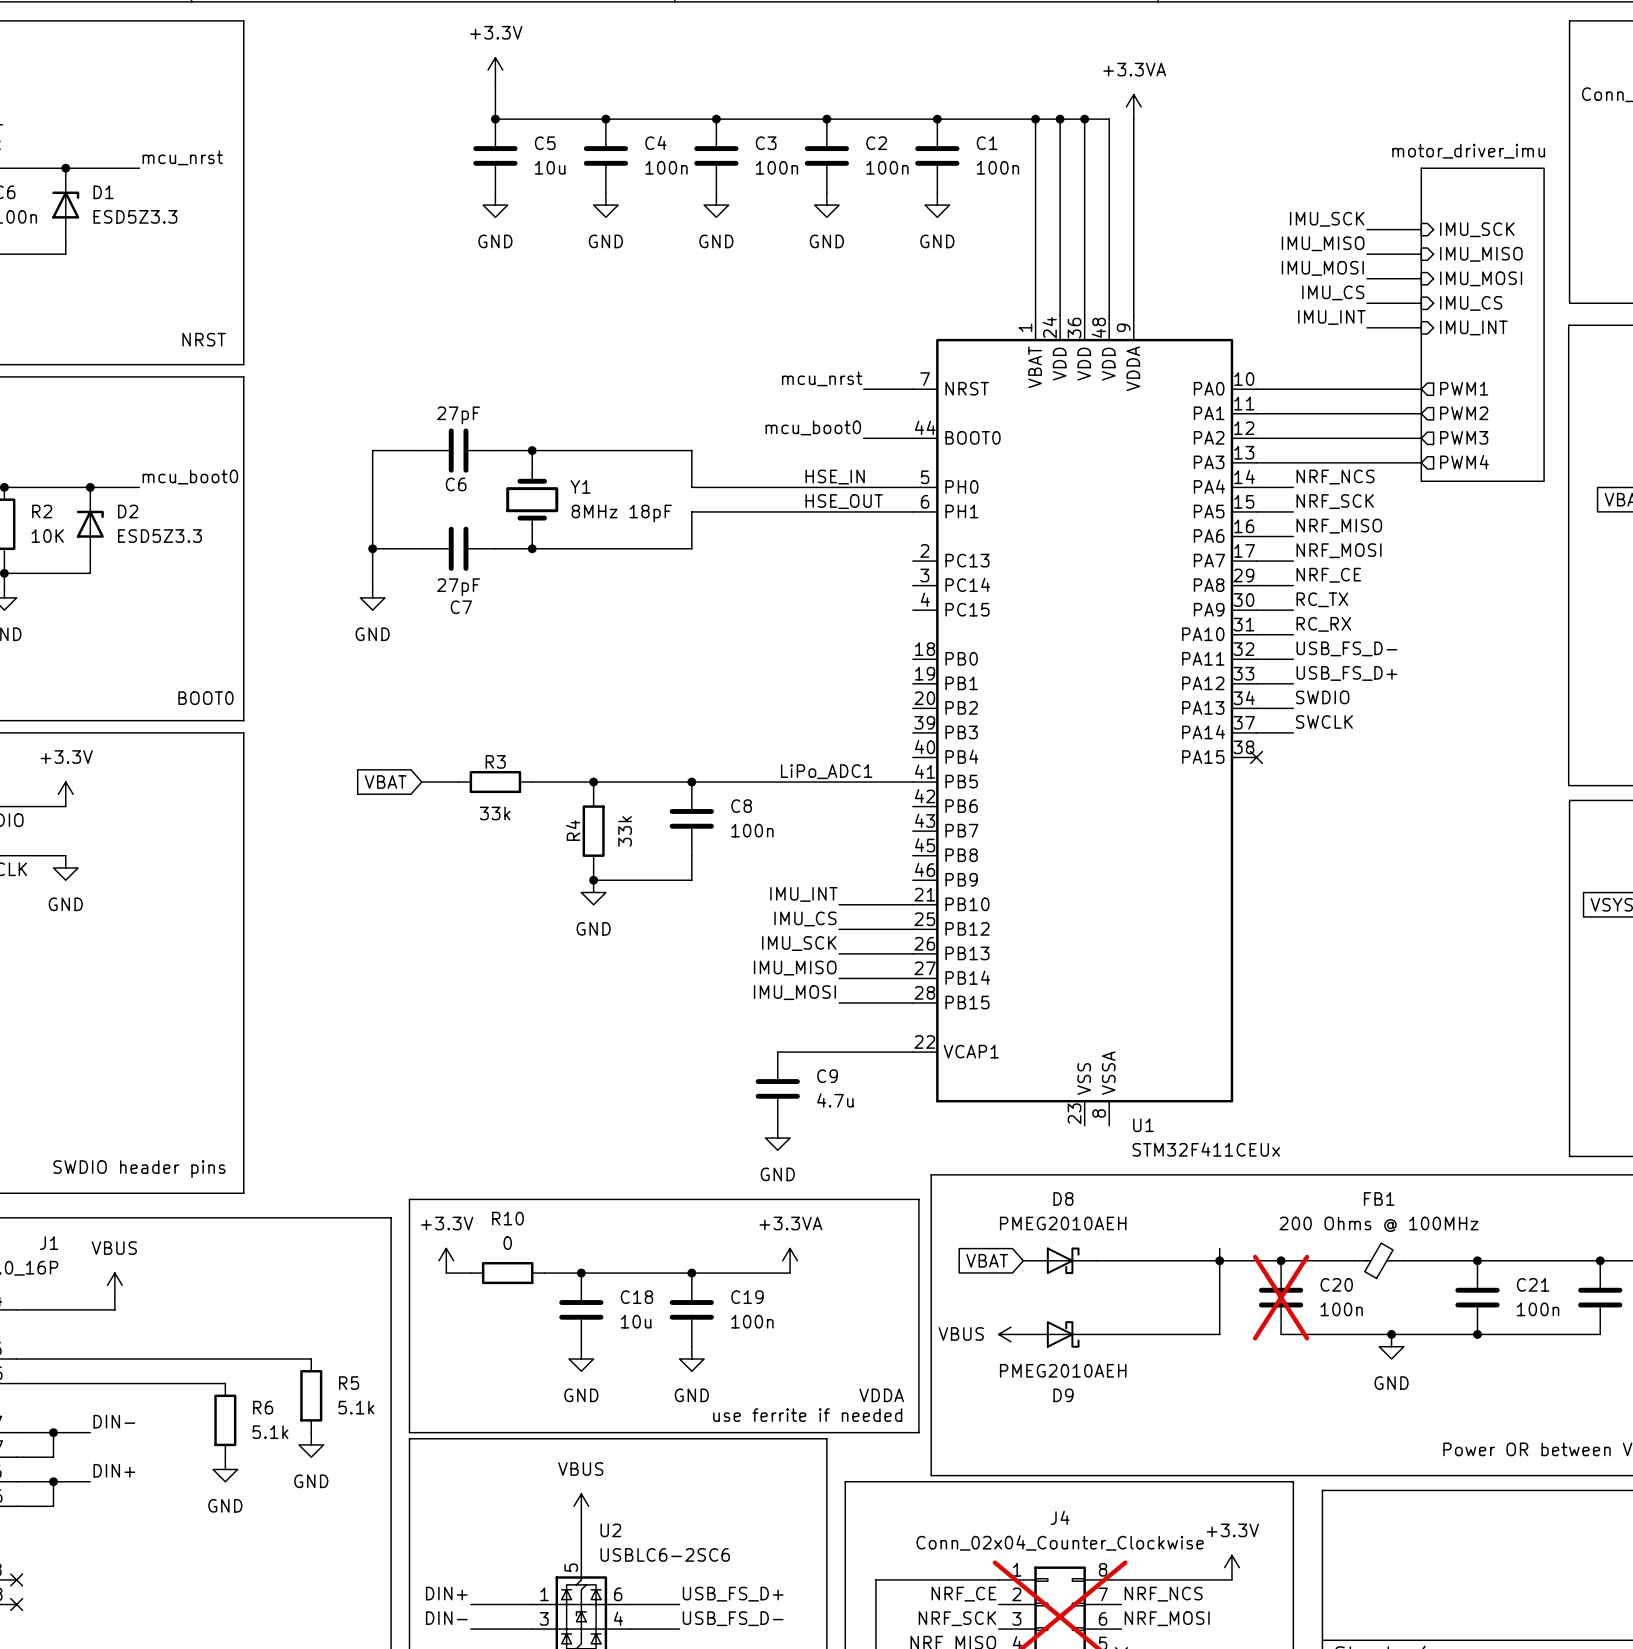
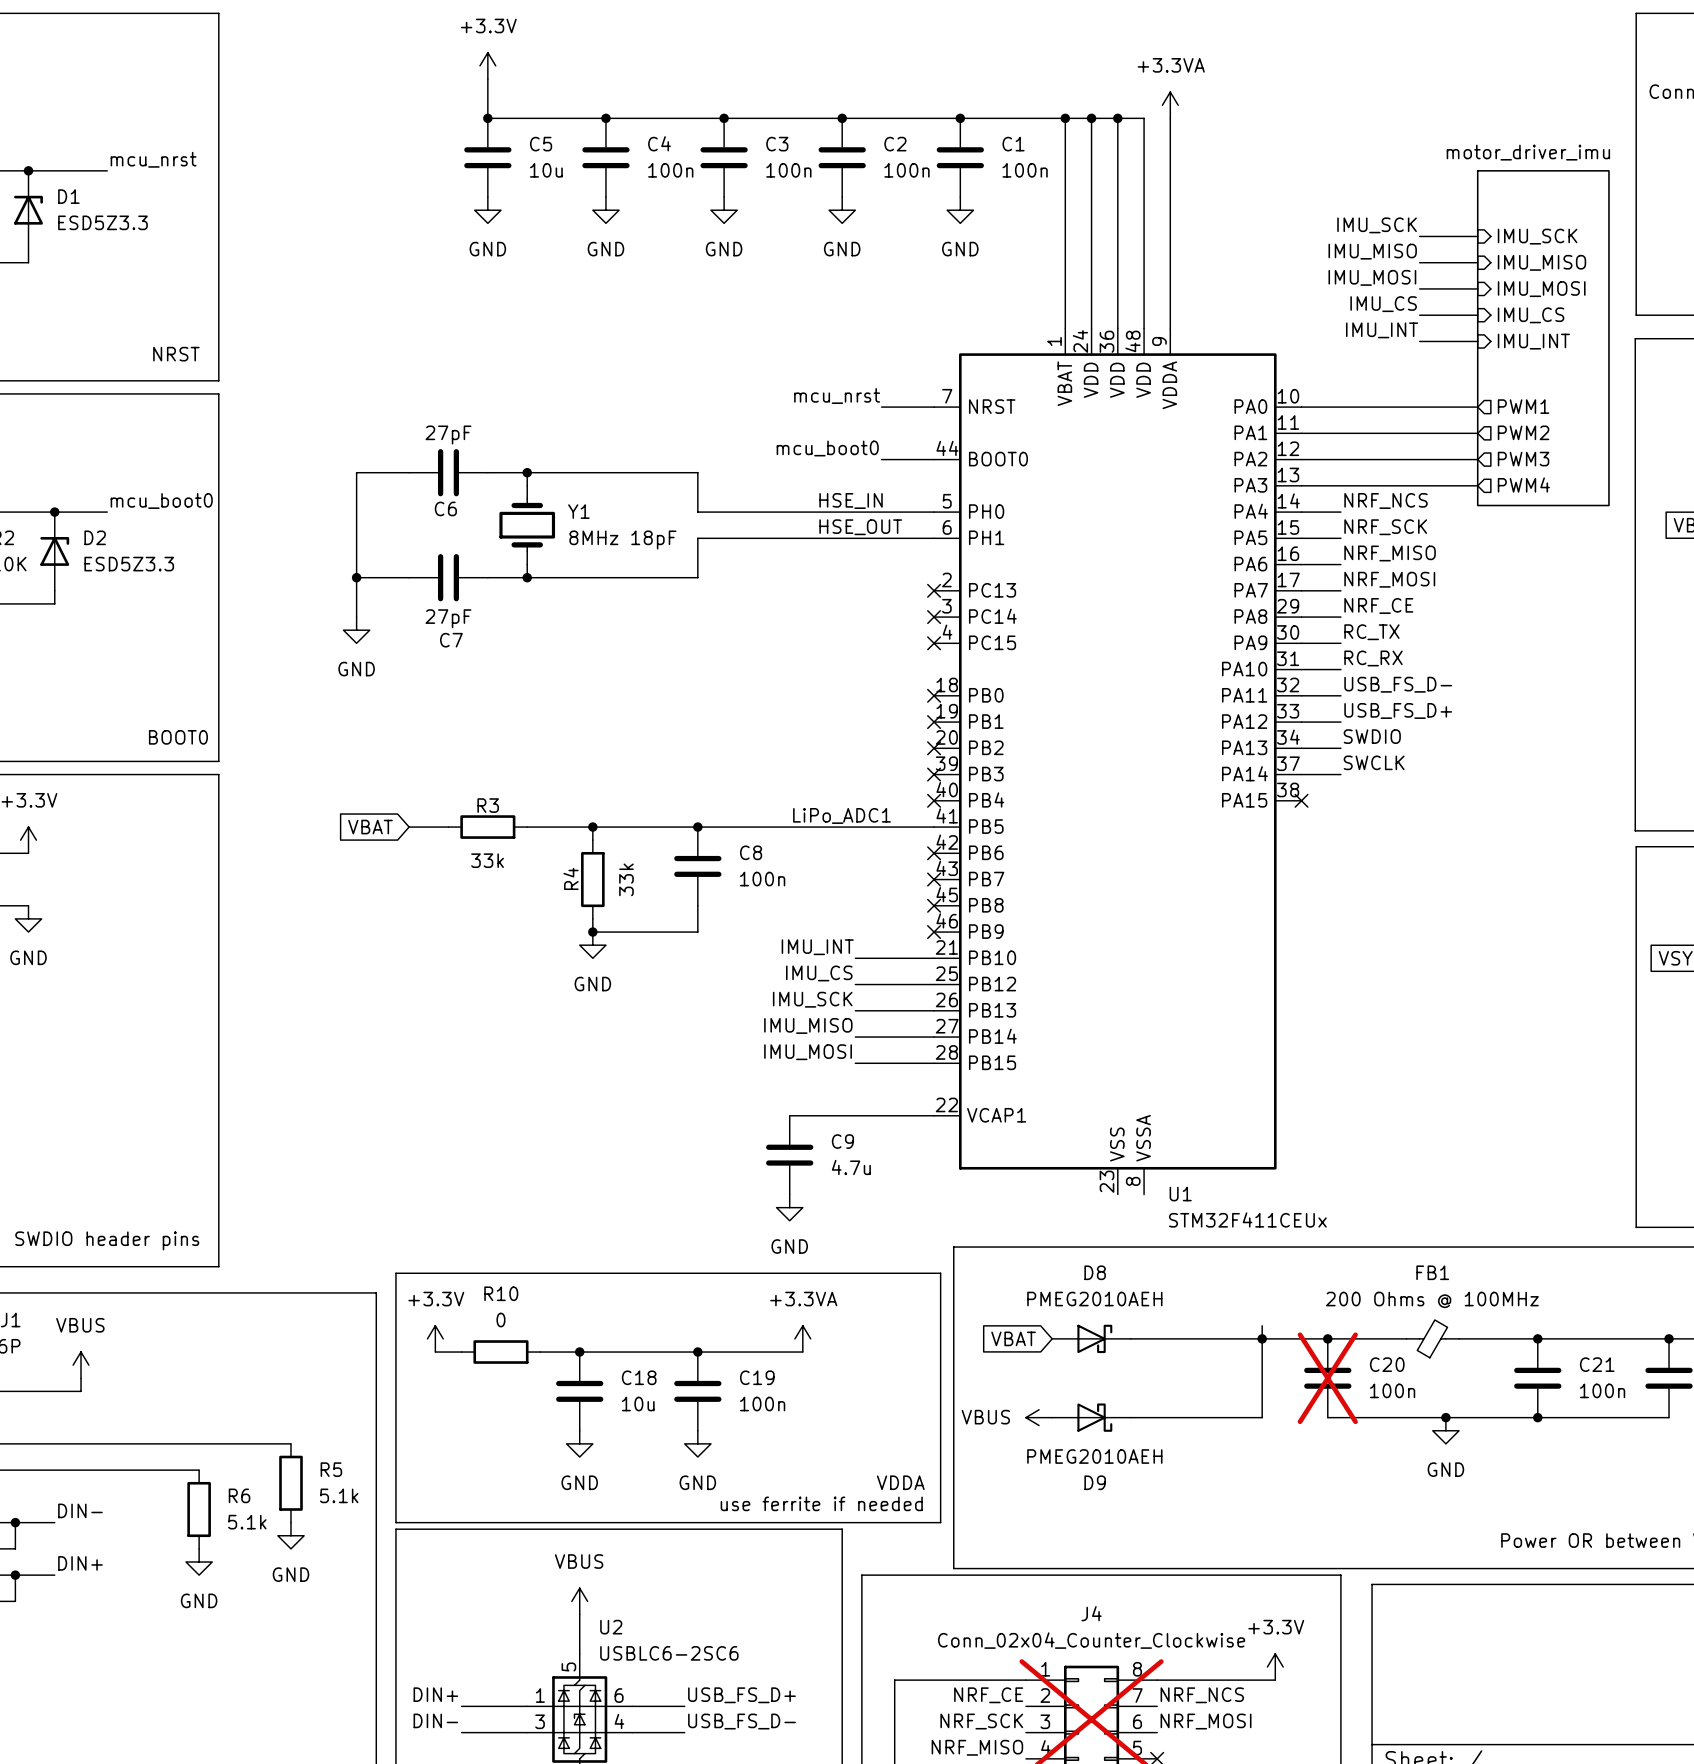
no-connect mark: none -> (934, 590)
no-connect mark: none -> (934, 617)
no-connect mark: none -> (934, 643)
no-connect mark: none -> (934, 695)
no-connect mark: none -> (934, 722)
no-connect mark: none -> (934, 748)
no-connect mark: none -> (934, 774)
no-connect mark: none -> (934, 800)
no-connect mark: none -> (934, 853)
no-connect mark: none -> (934, 879)
no-connect mark: none -> (934, 905)
no-connect mark: none -> (934, 932)

